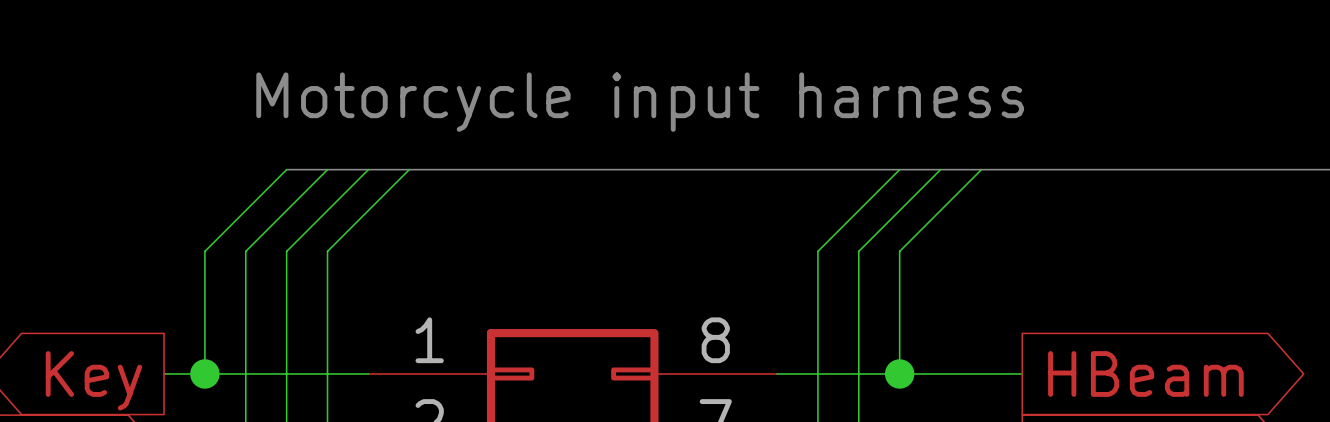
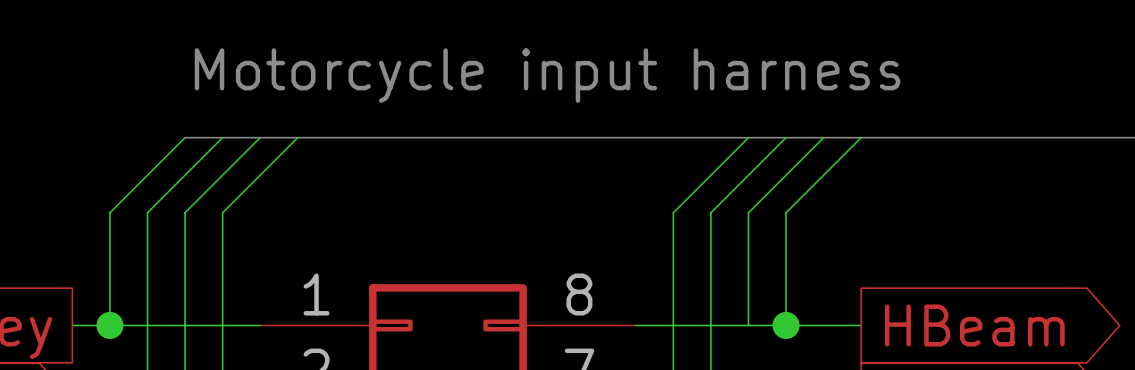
text position: Motorcycle input harness (640, 102) -> Motorcycle input harness (547, 75)
wire: none -> (861, 137) (786, 212) (786, 325)
junction: (899, 373) -> none
junction: none -> (786, 325)

